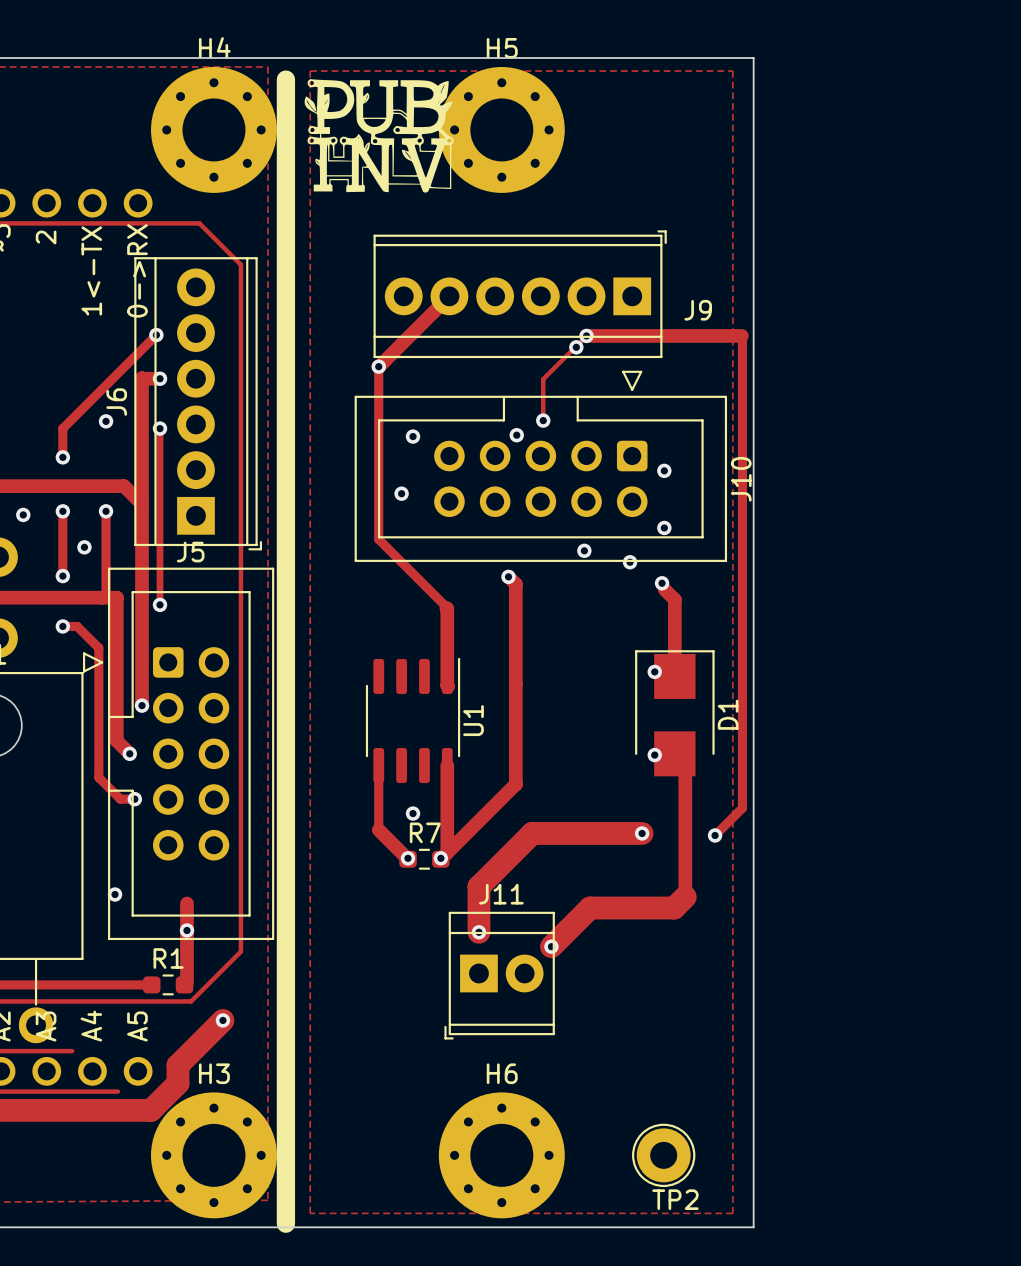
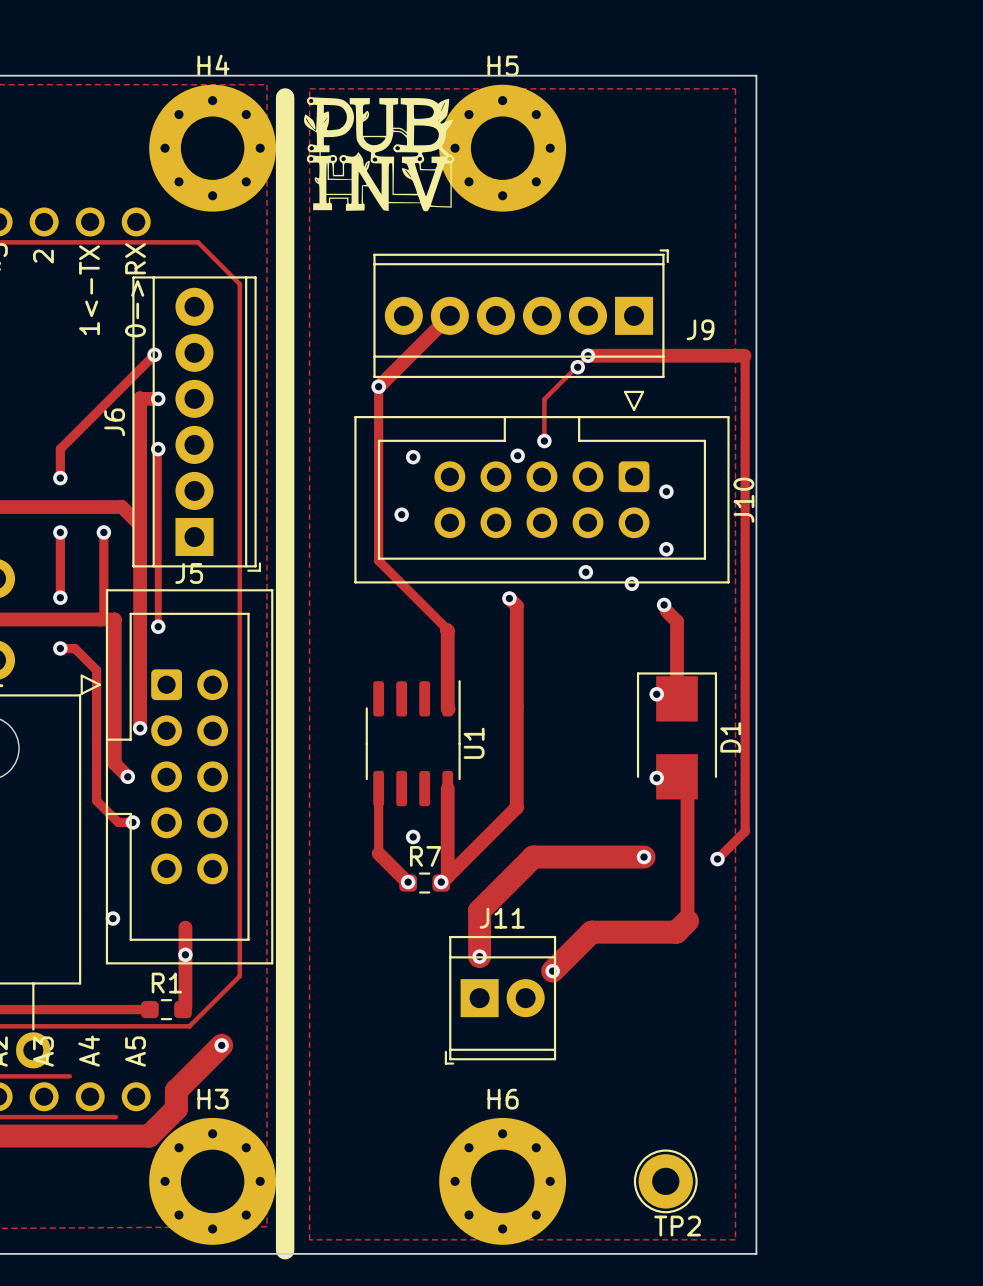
via: (106, 421) -> none
via: (23, 514) -> none
via: (84, 547) -> none

